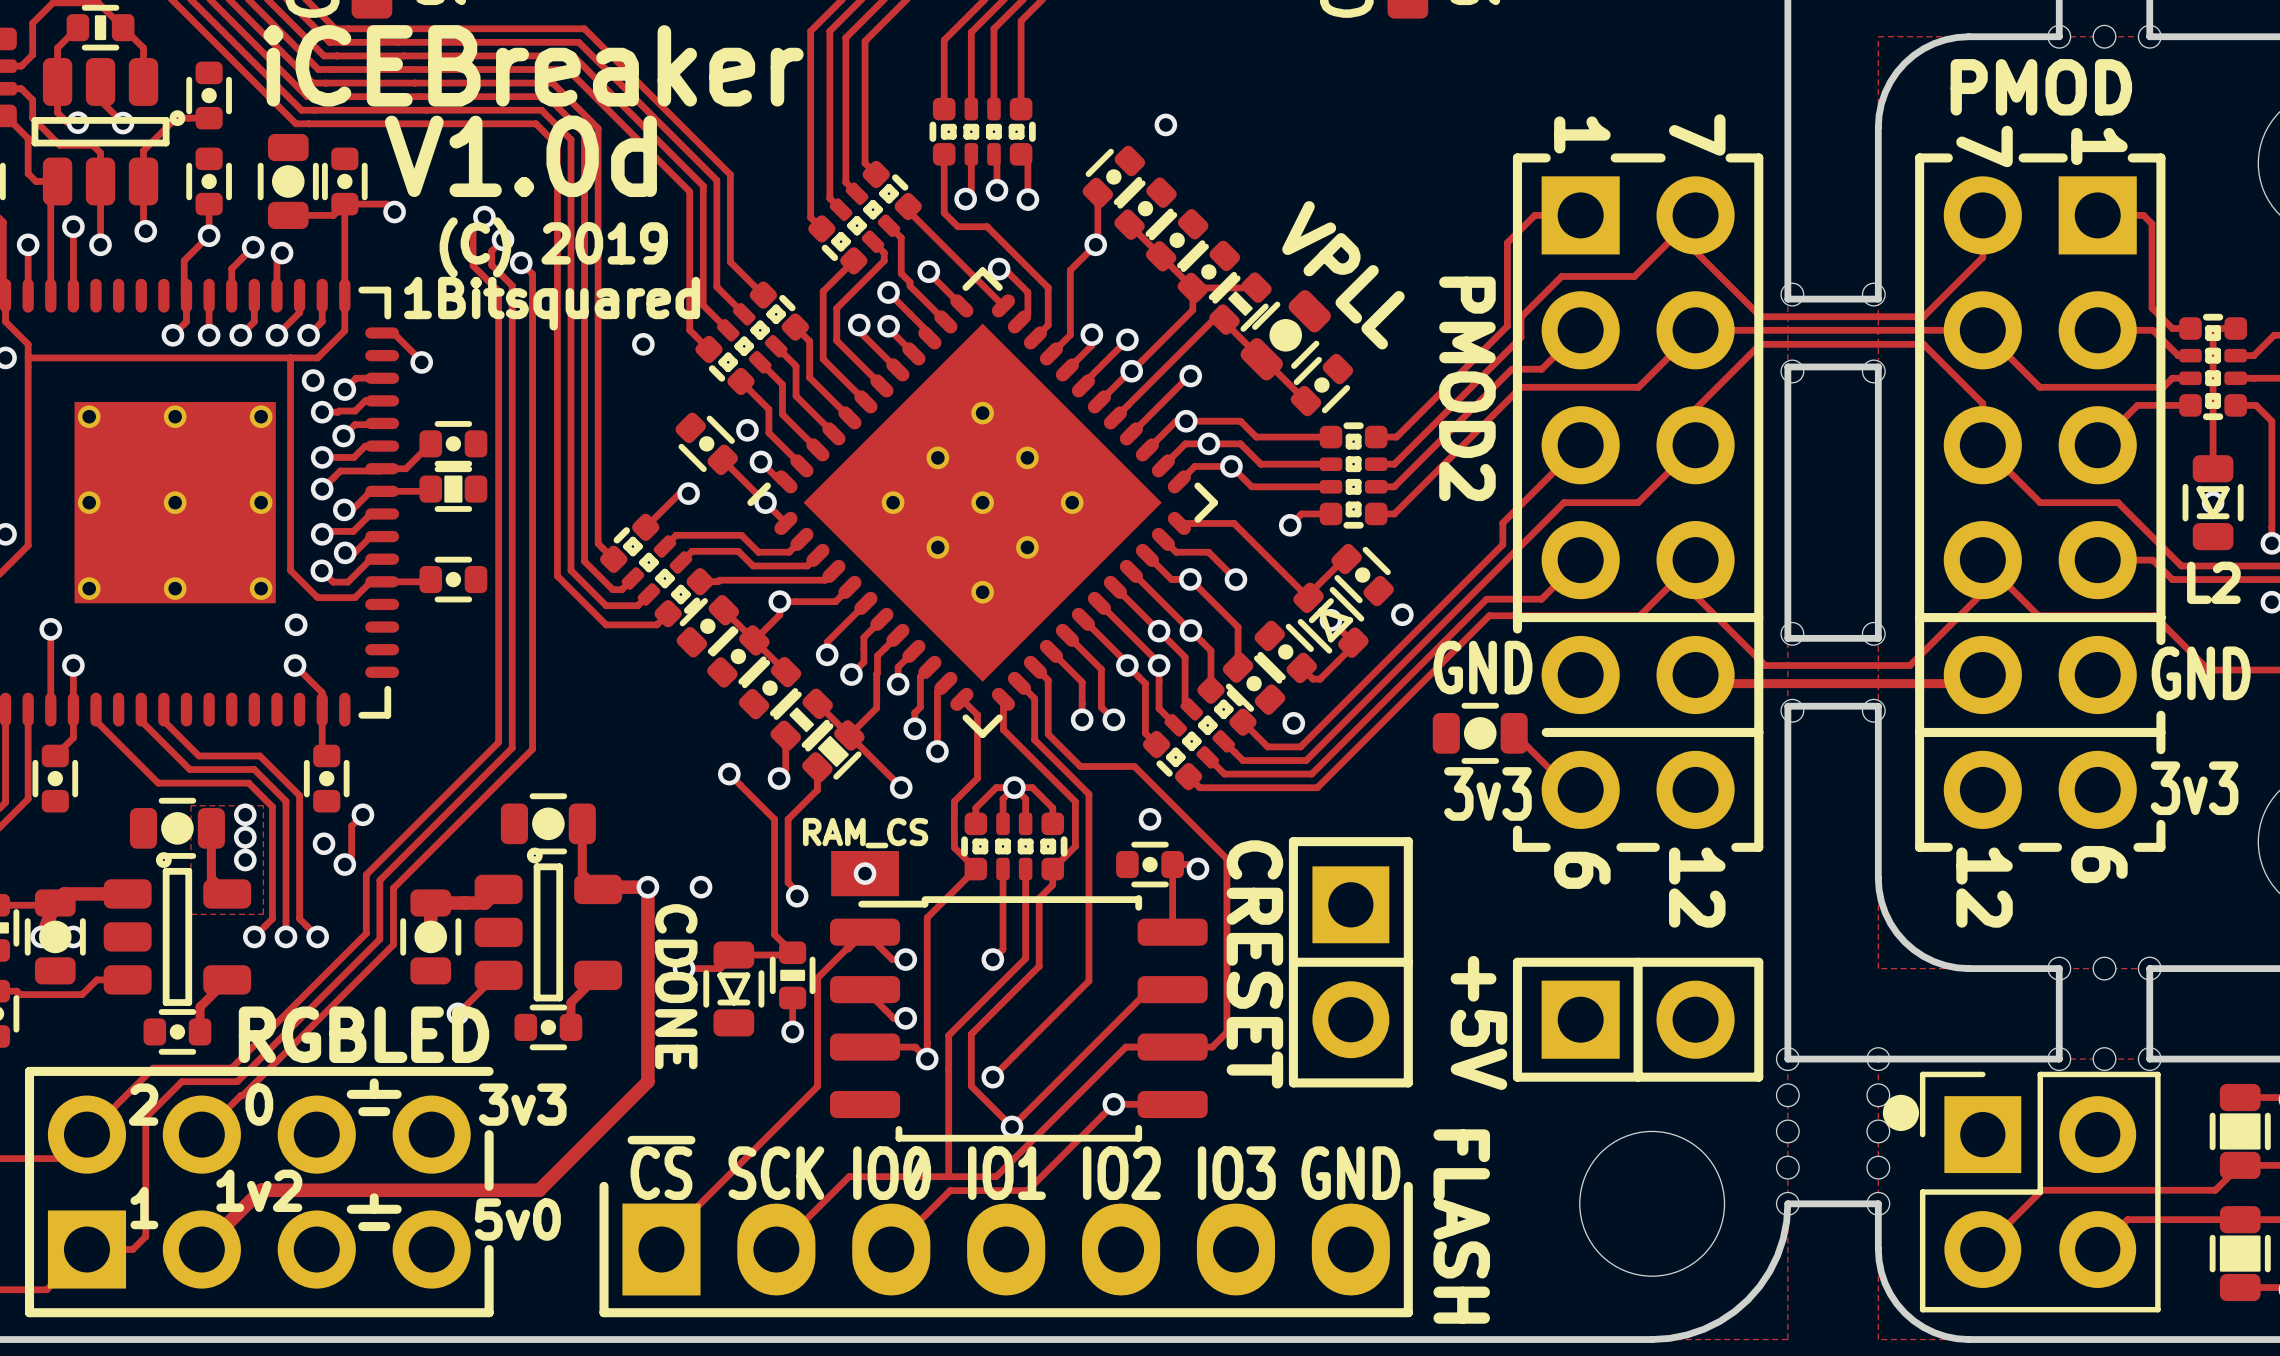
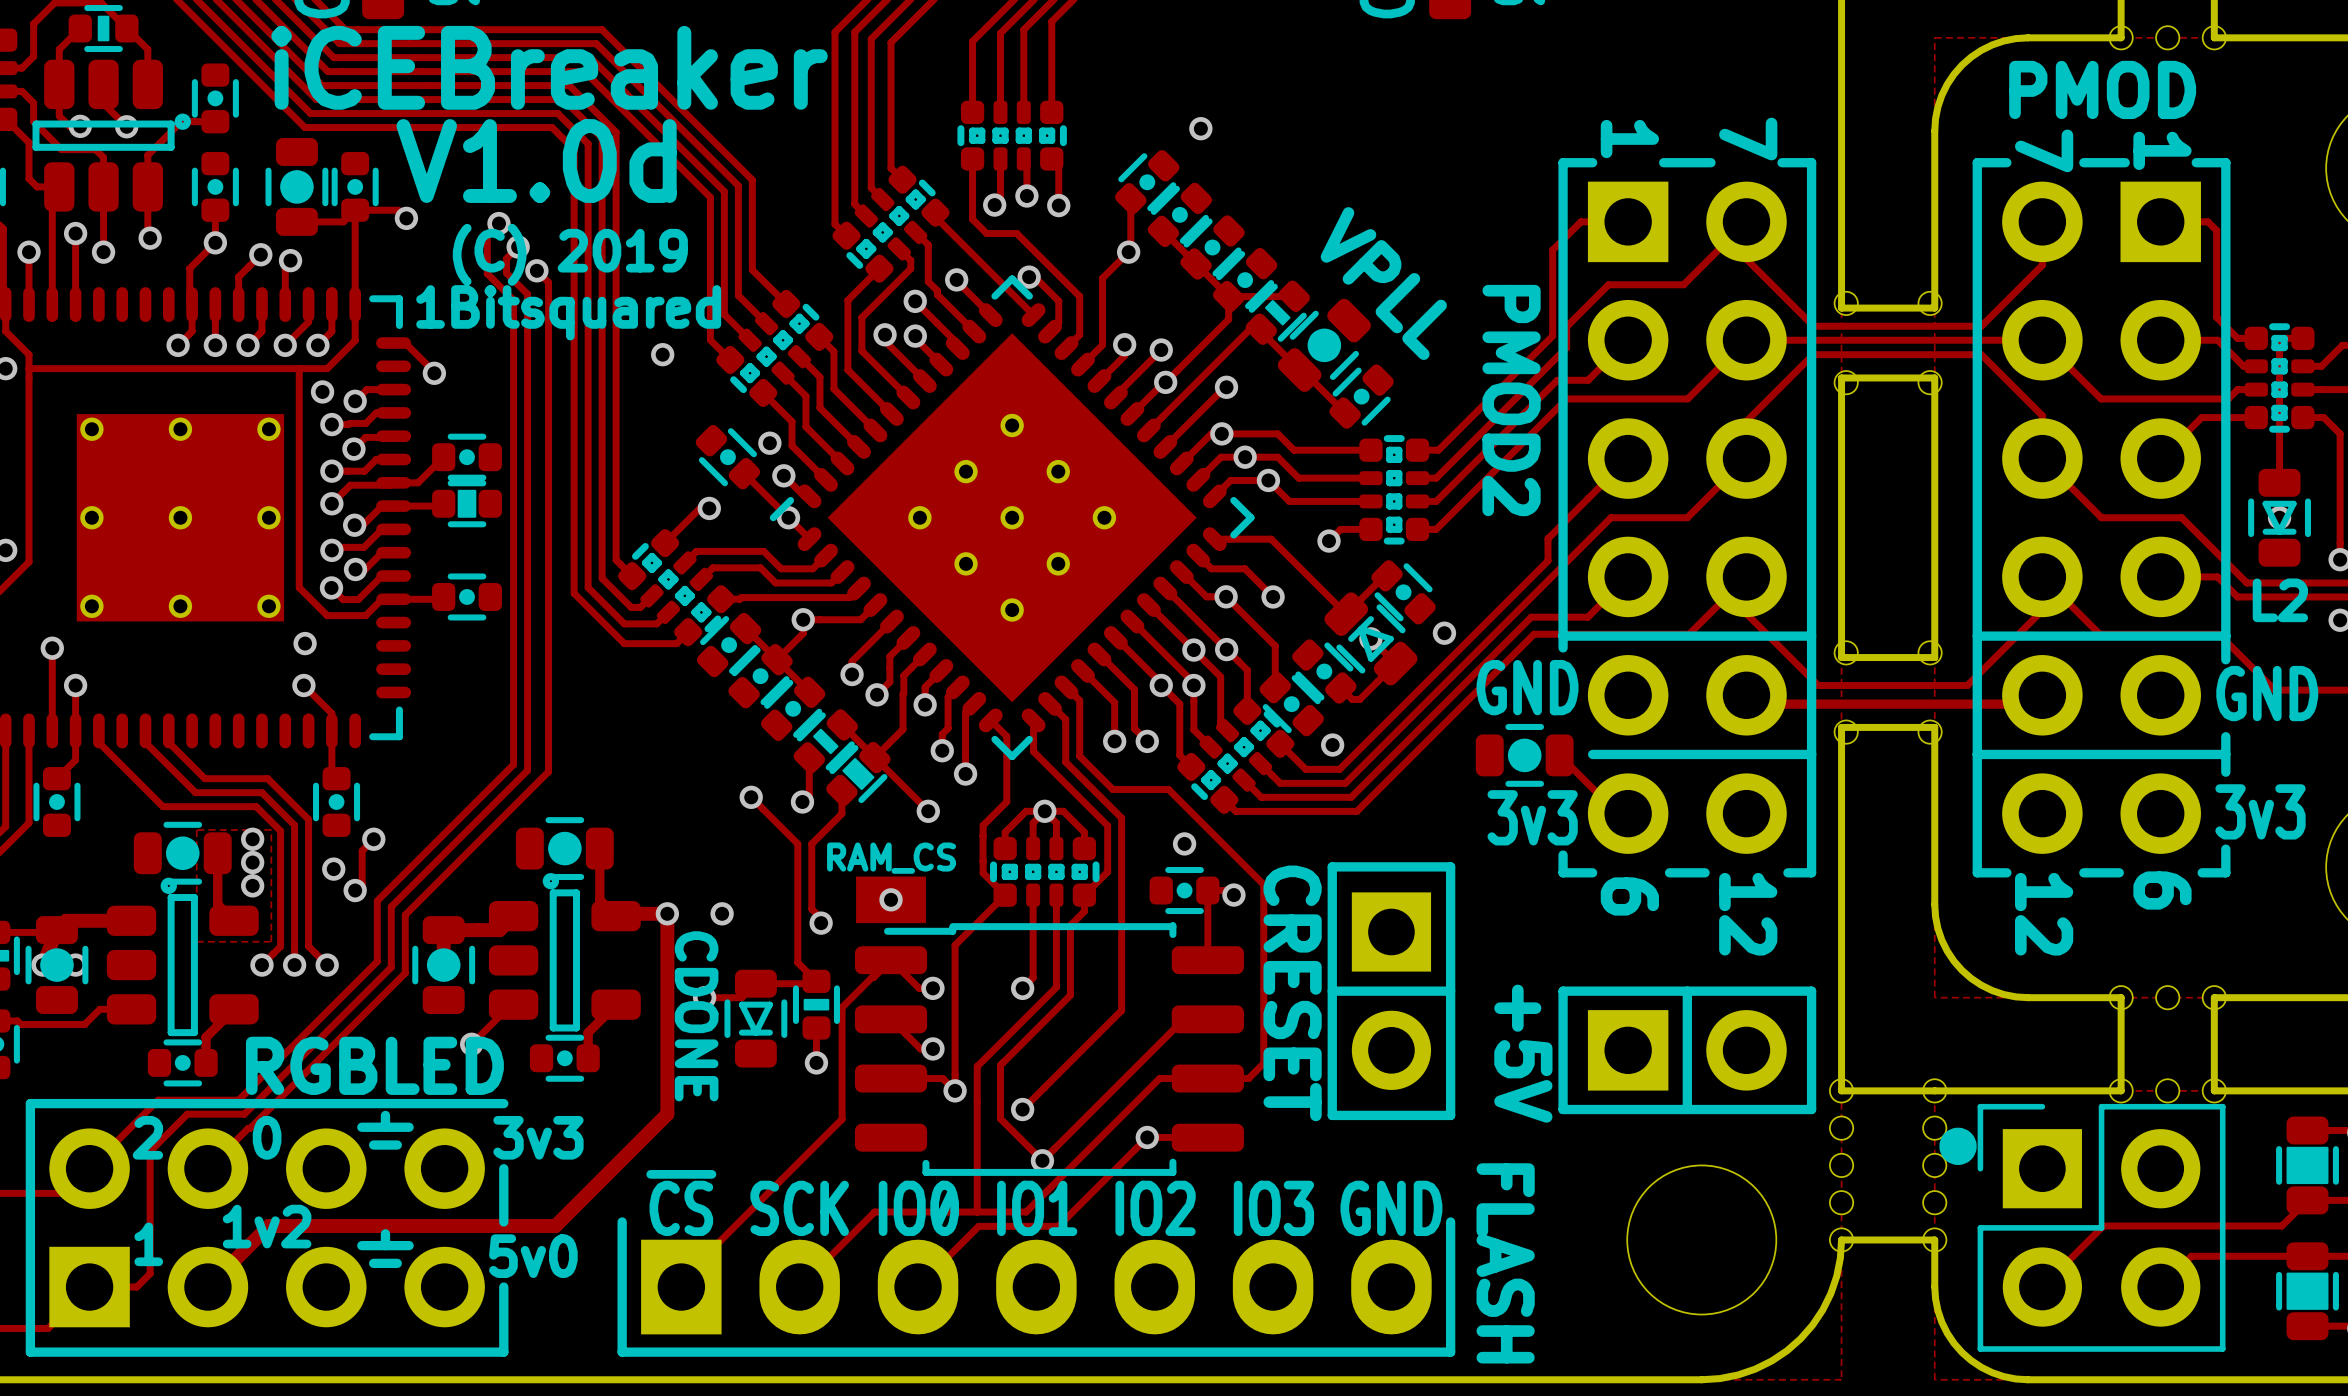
part footprint: [1293, 582, 1369, 658] -> [1324, 592, 1418, 686]

